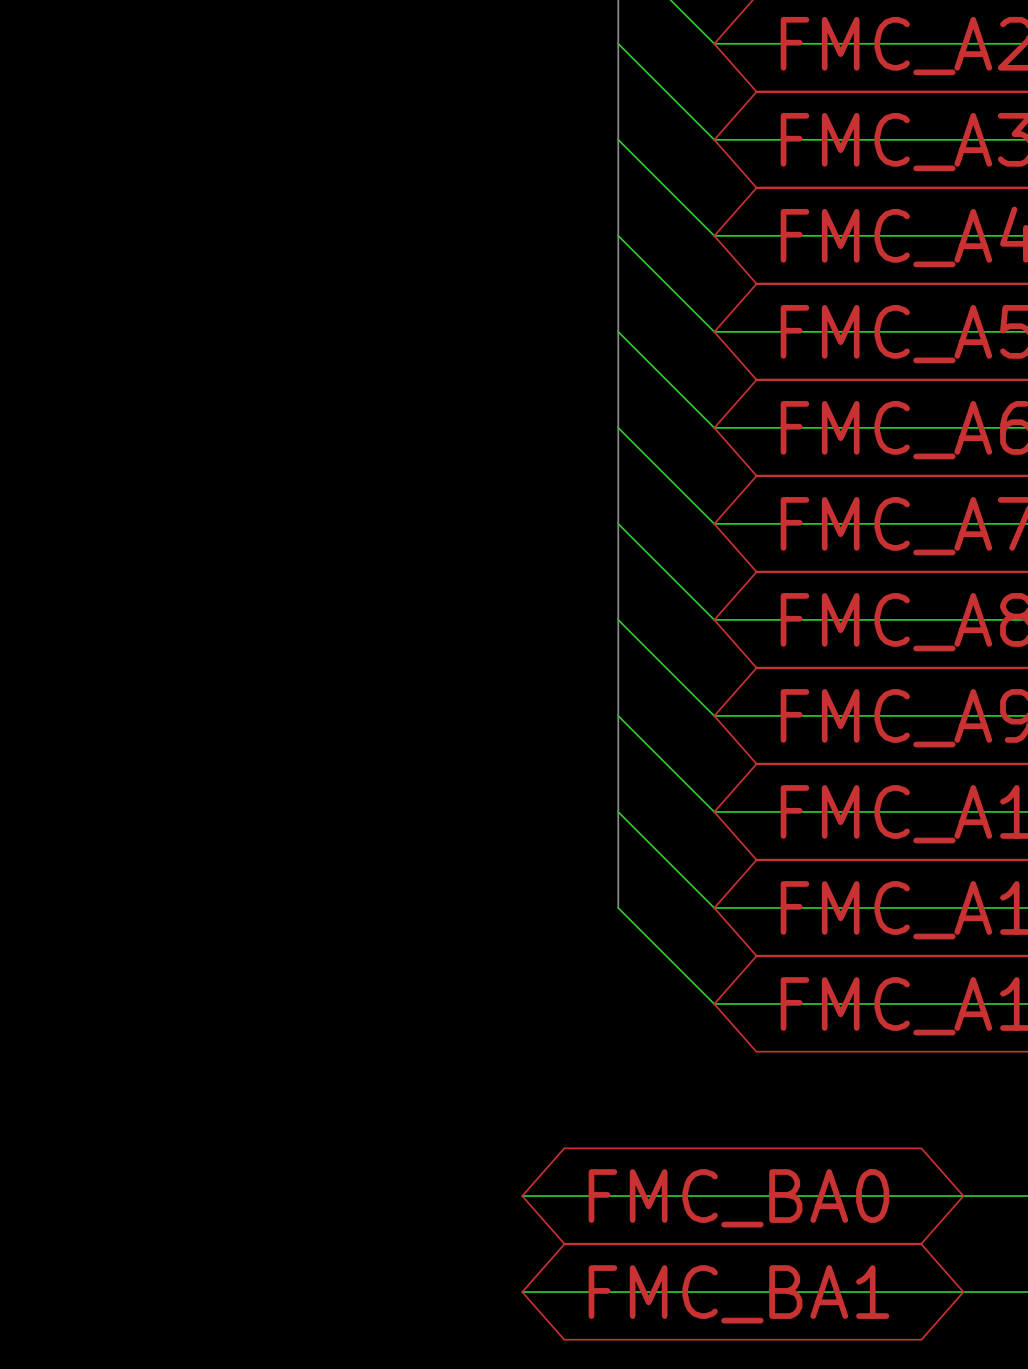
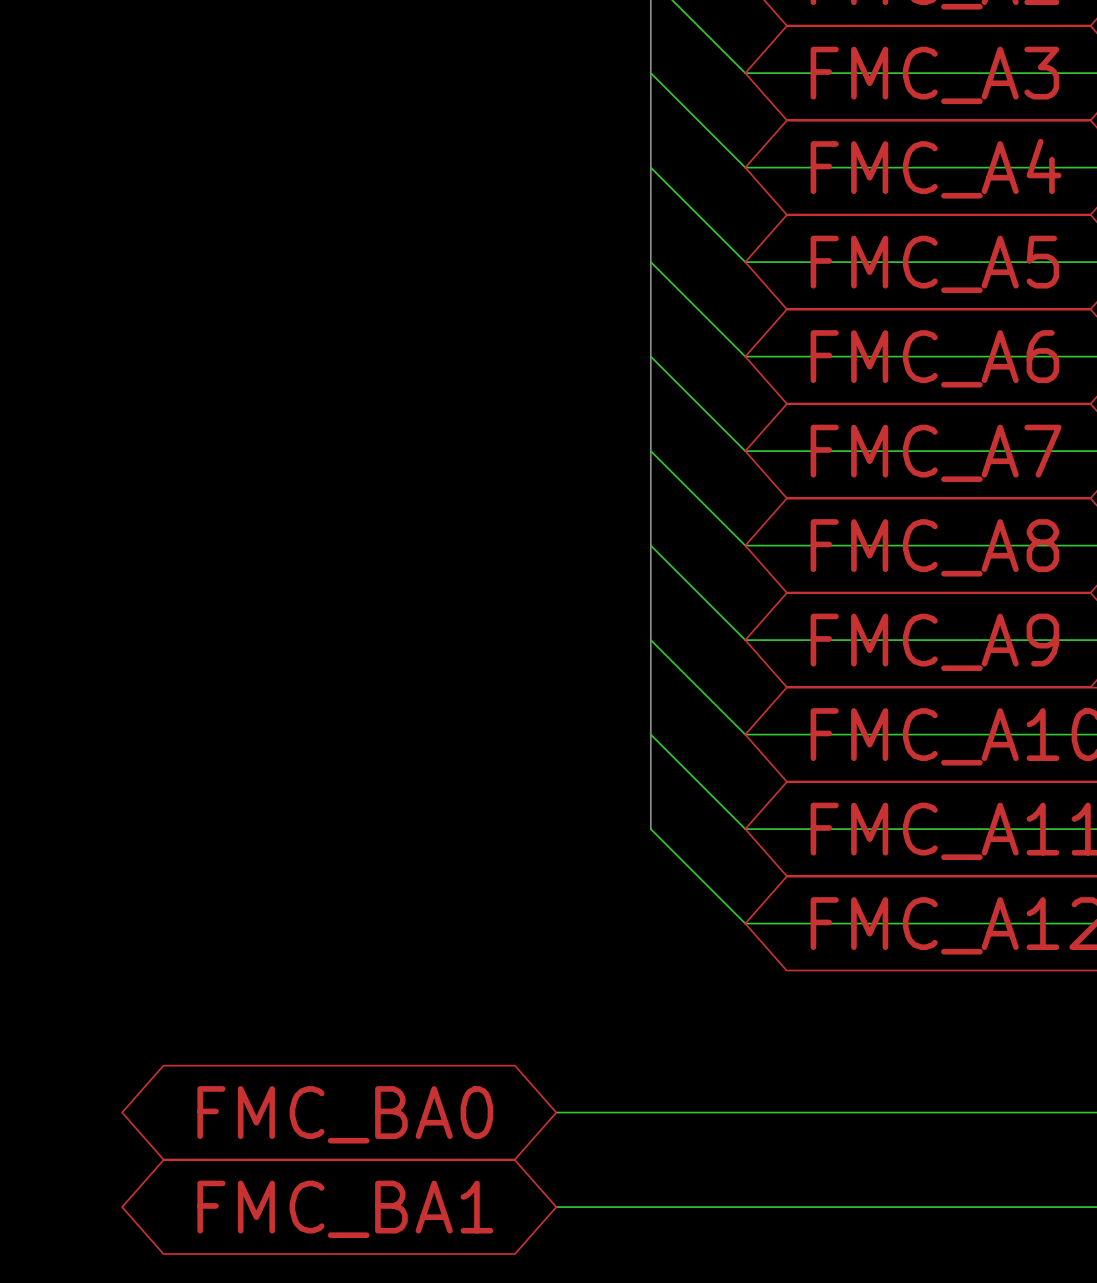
global label rotation: 0° (738, 1198) -> 180° (345, 1114)
global label rotation: 0° (738, 1294) -> 180° (345, 1209)

